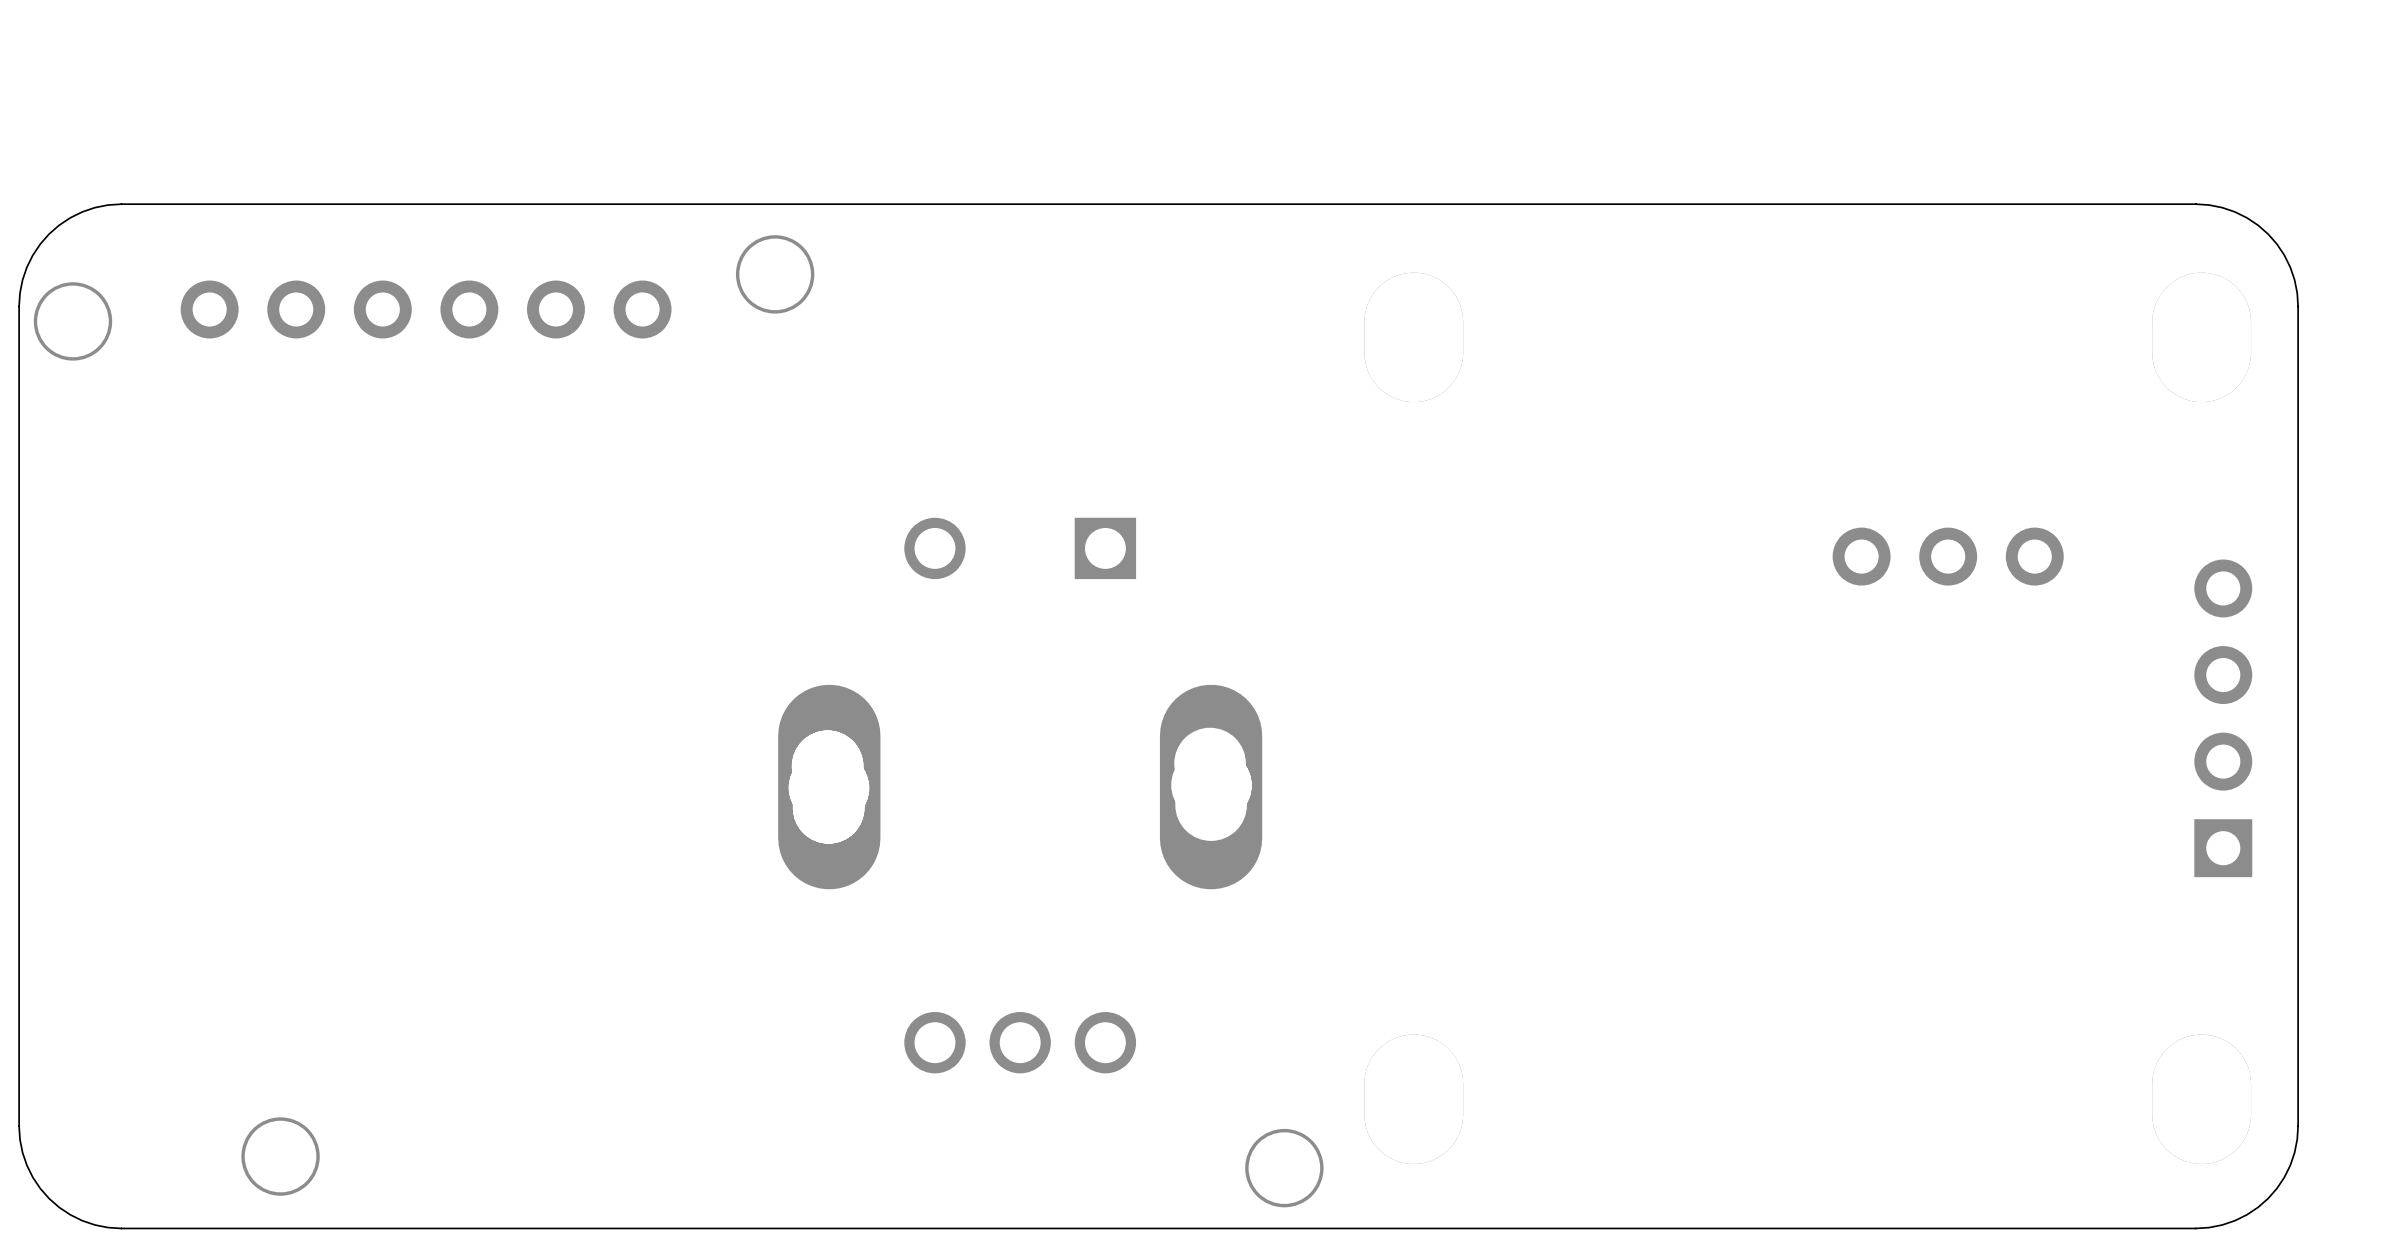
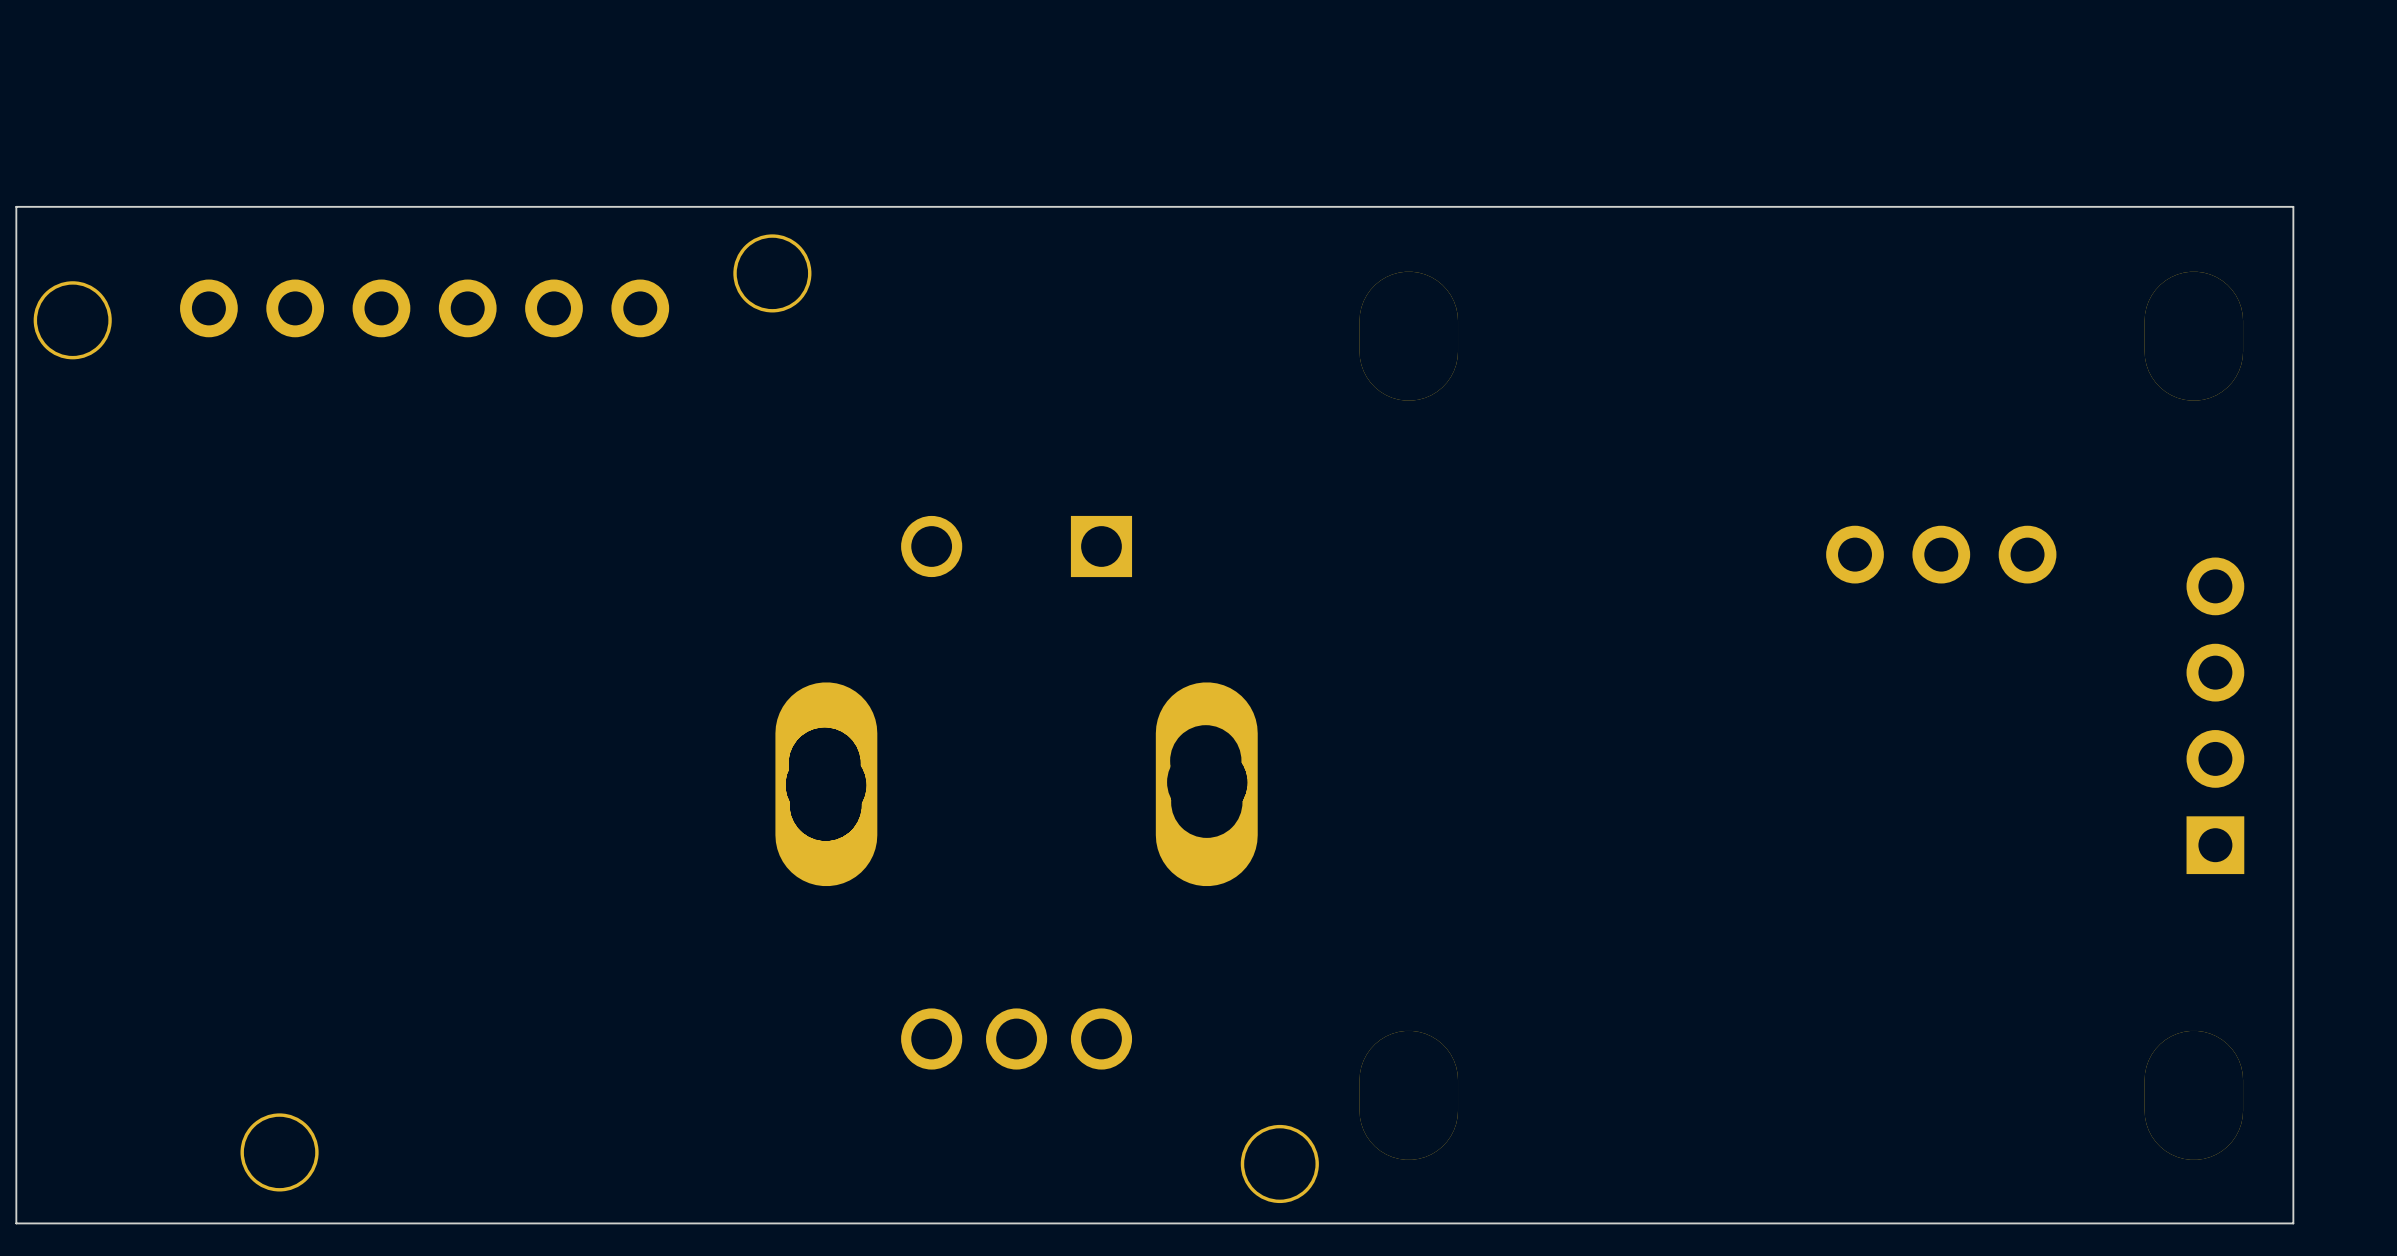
board edge: (2195, 204) (121, 204) (94, 207) (82, 211) (59, 225) (49, 234) (32, 255) (22, 279) (19, 306) (19, 1126) (19, 1139) (26, 1165) (40, 1188) (59, 1207) (82, 1220) (94, 1224) (121, 1228) (2195, 1228) (2222, 1224) (2234, 1220) (2258, 1207) (2276, 1188) (2290, 1165) (2297, 1139) (2298, 306) (2294, 279) (2290, 267) (2284, 255) (2268, 234) (2258, 225) (2234, 211) (2209, 205) (2195, 204) -> (2293, 206) (2293, 1223) (16, 1223) (16, 206) (2293, 206)

